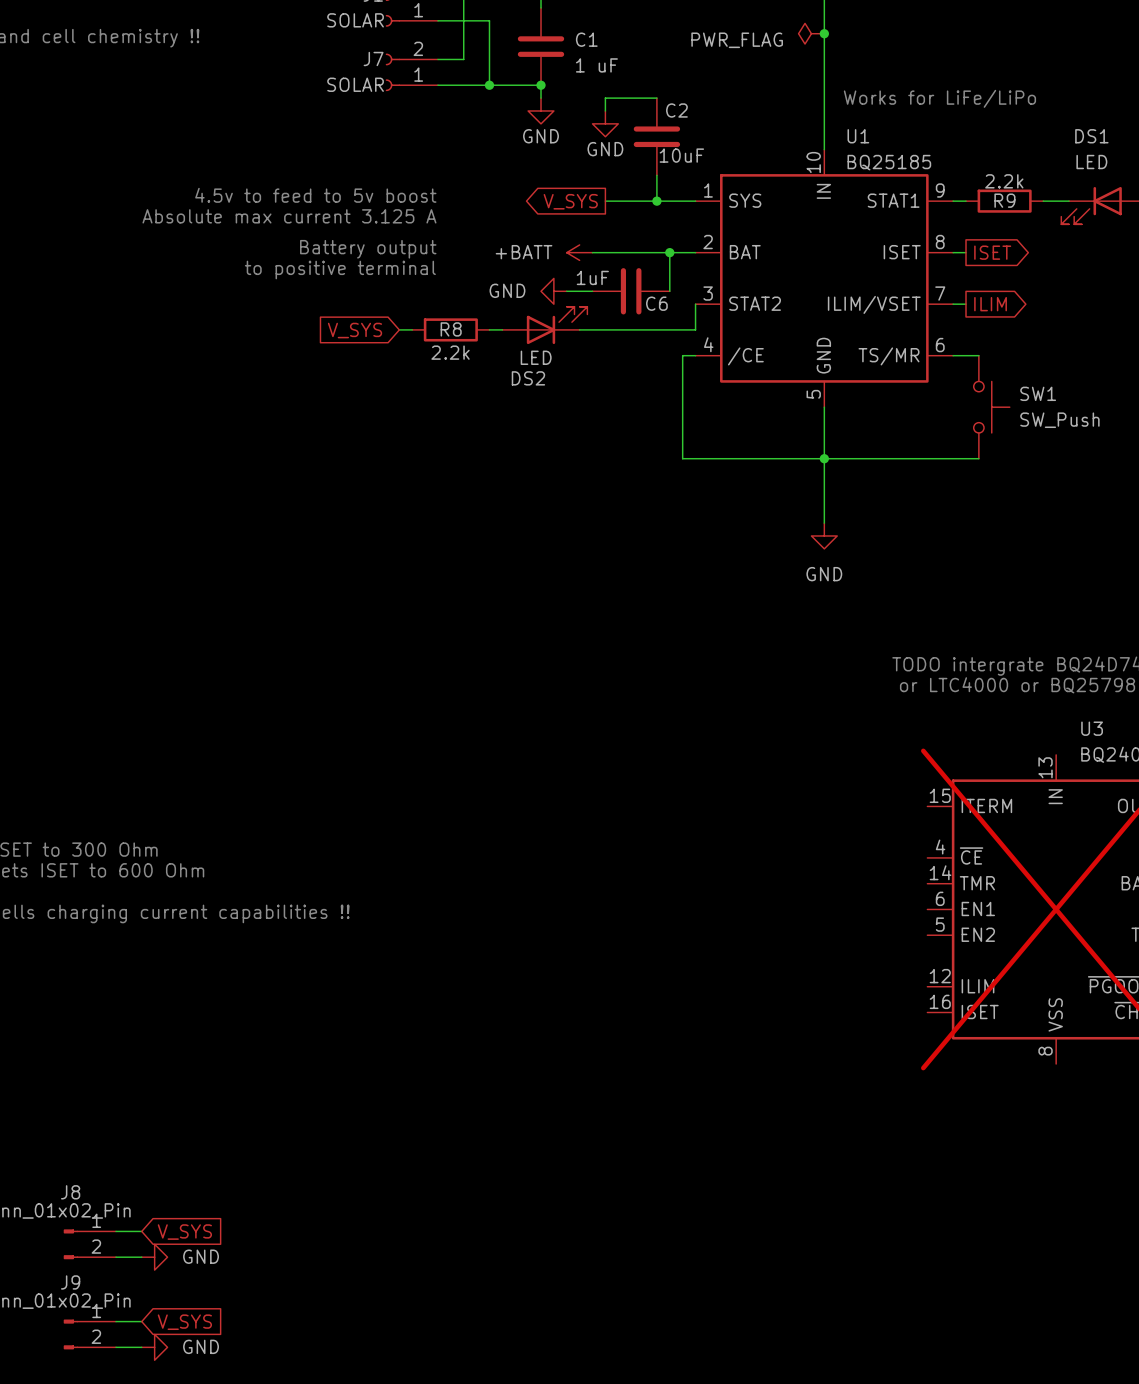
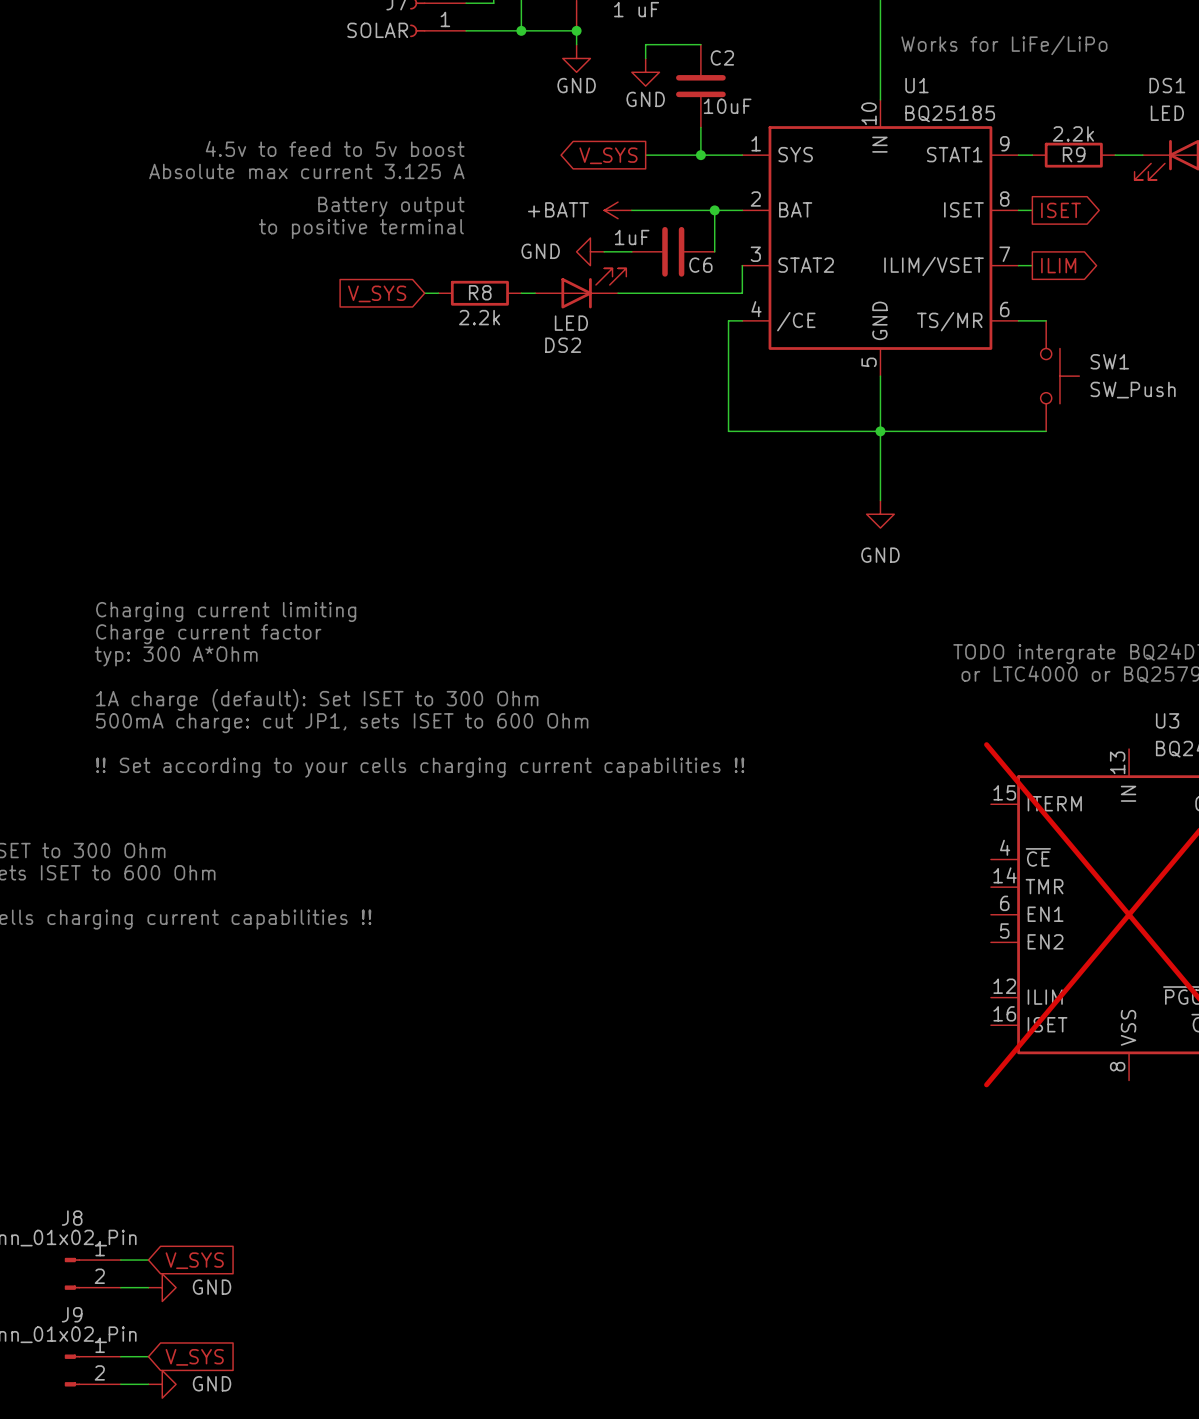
text: none -> Charging current limiting (226, 611)
text: none -> Charge current factor (208, 634)
text: none -> typ: 300 A*Ohm (176, 656)
text: none -> 1A charge (default): Set ISET to 300 Ohm (317, 700)
text: none -> 500mA charge: cut JP1, sets ISET to 600 Ohm (342, 723)
text: none -> !! Set according to your cells charging current capabilities !! (420, 767)

